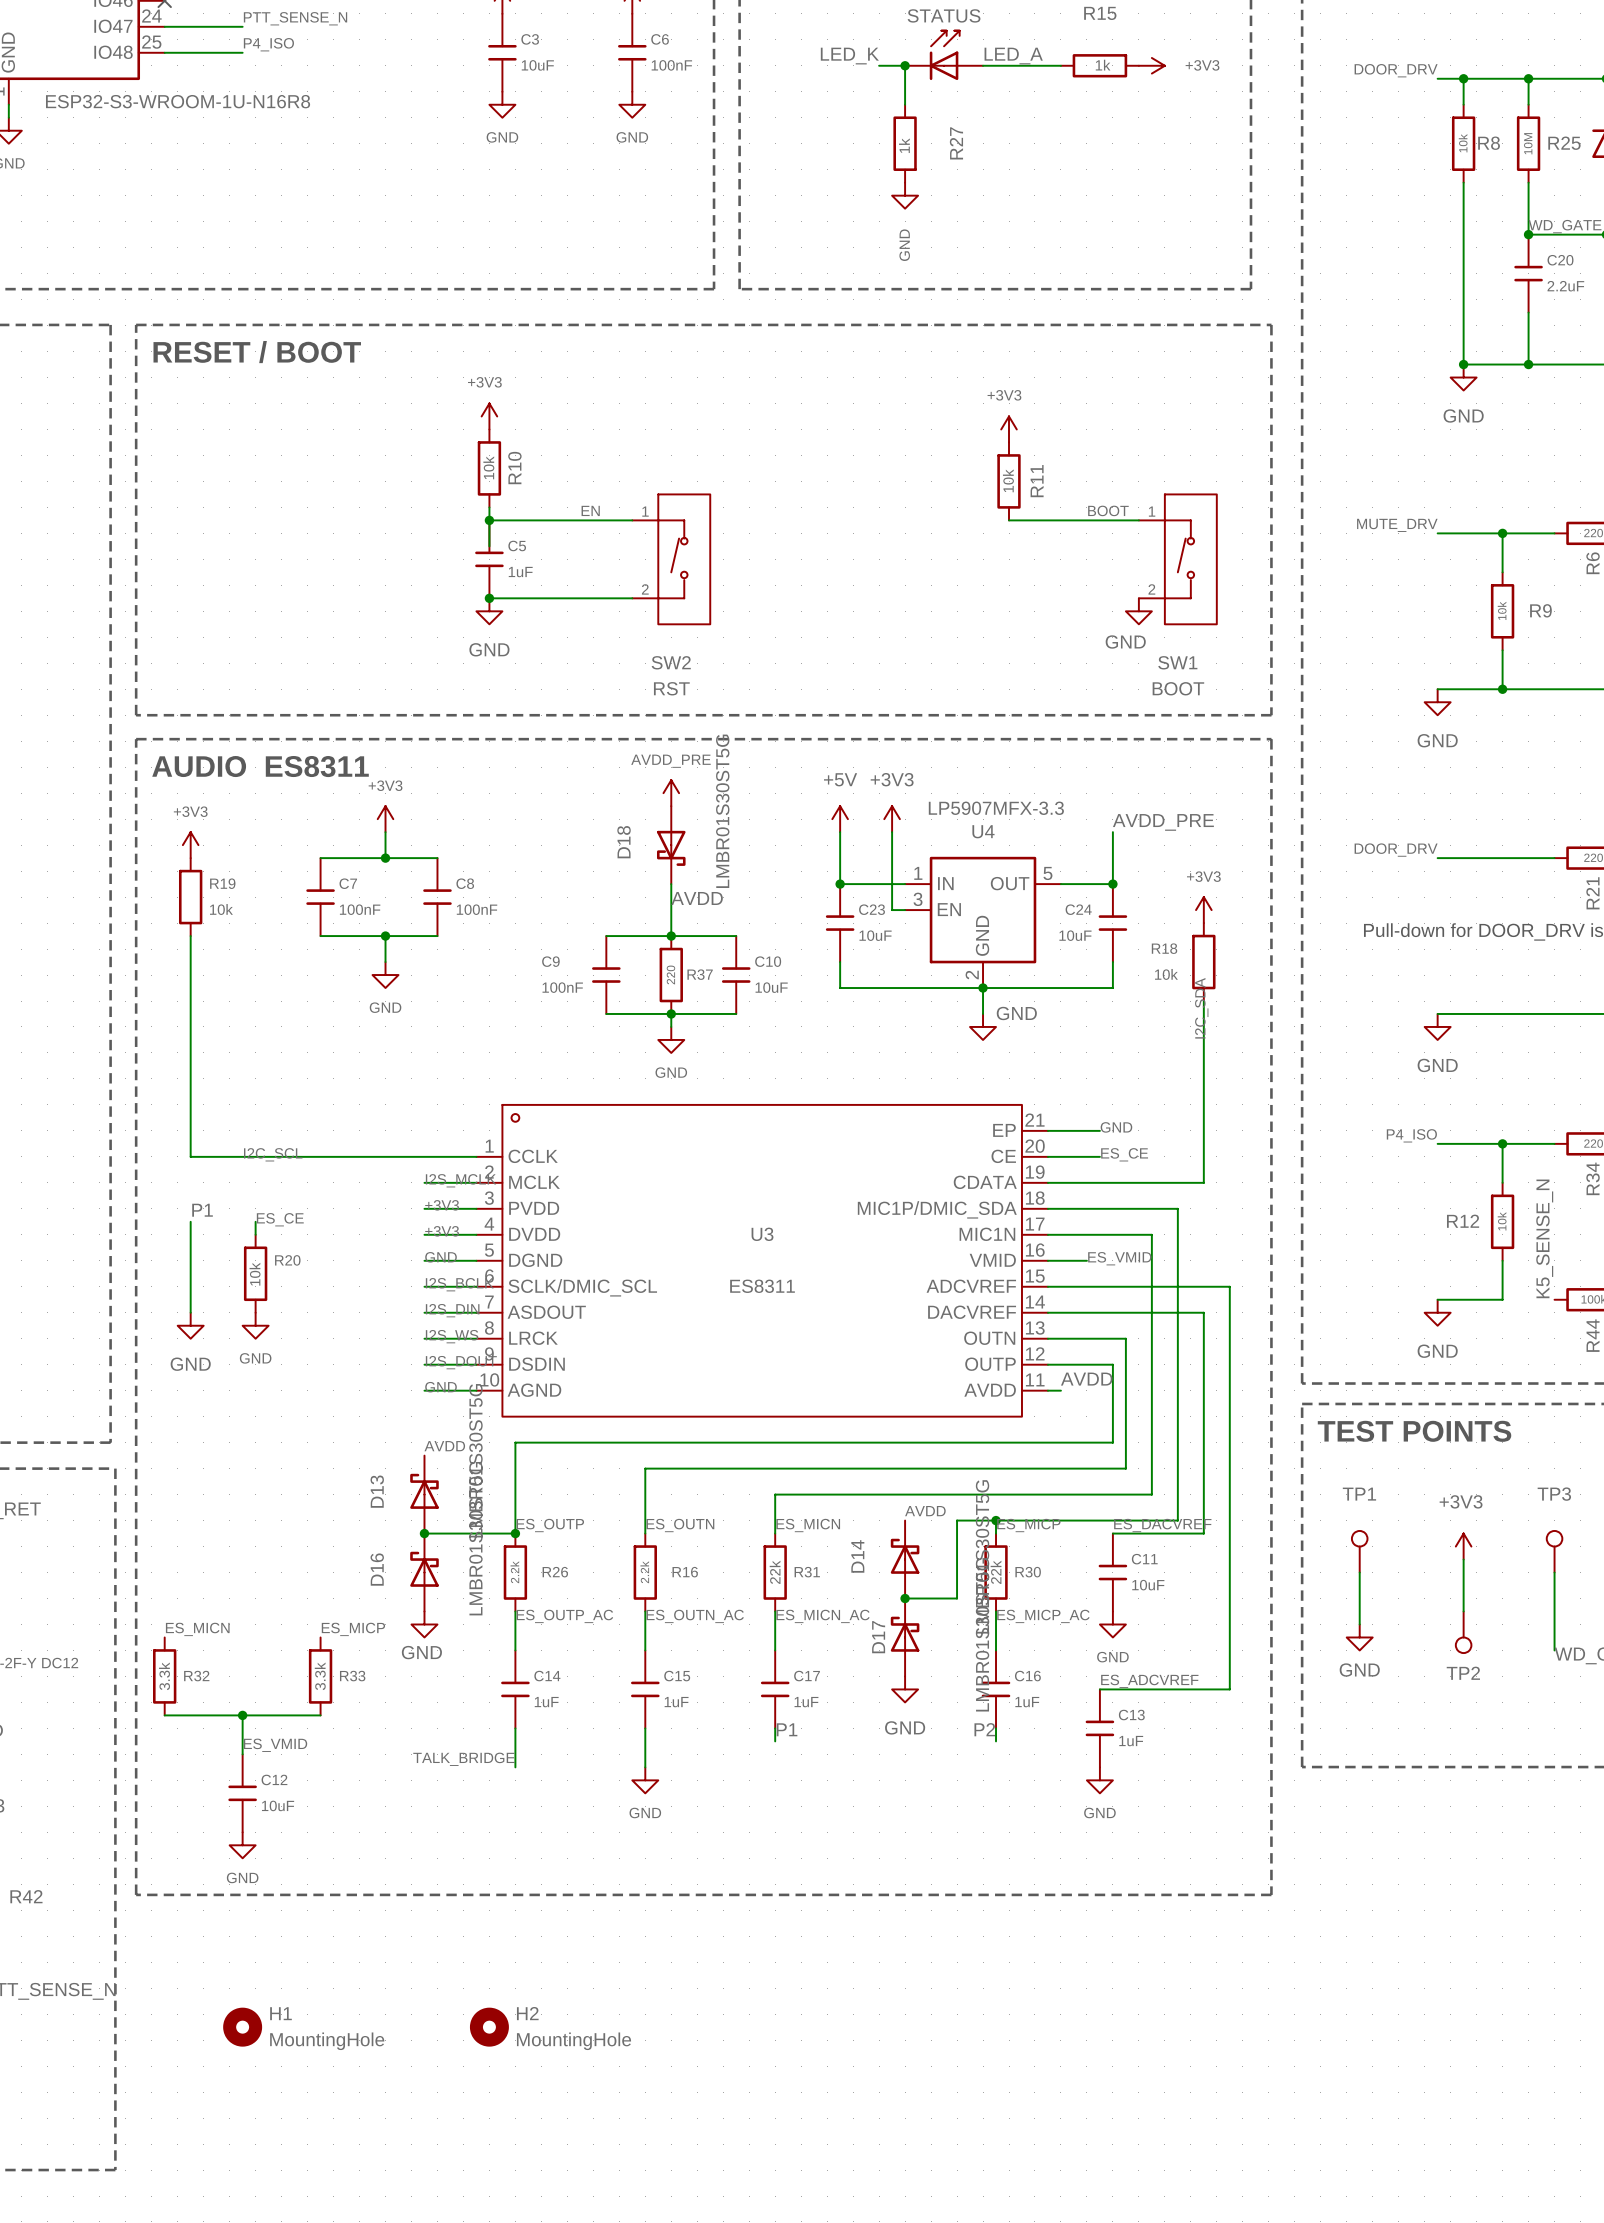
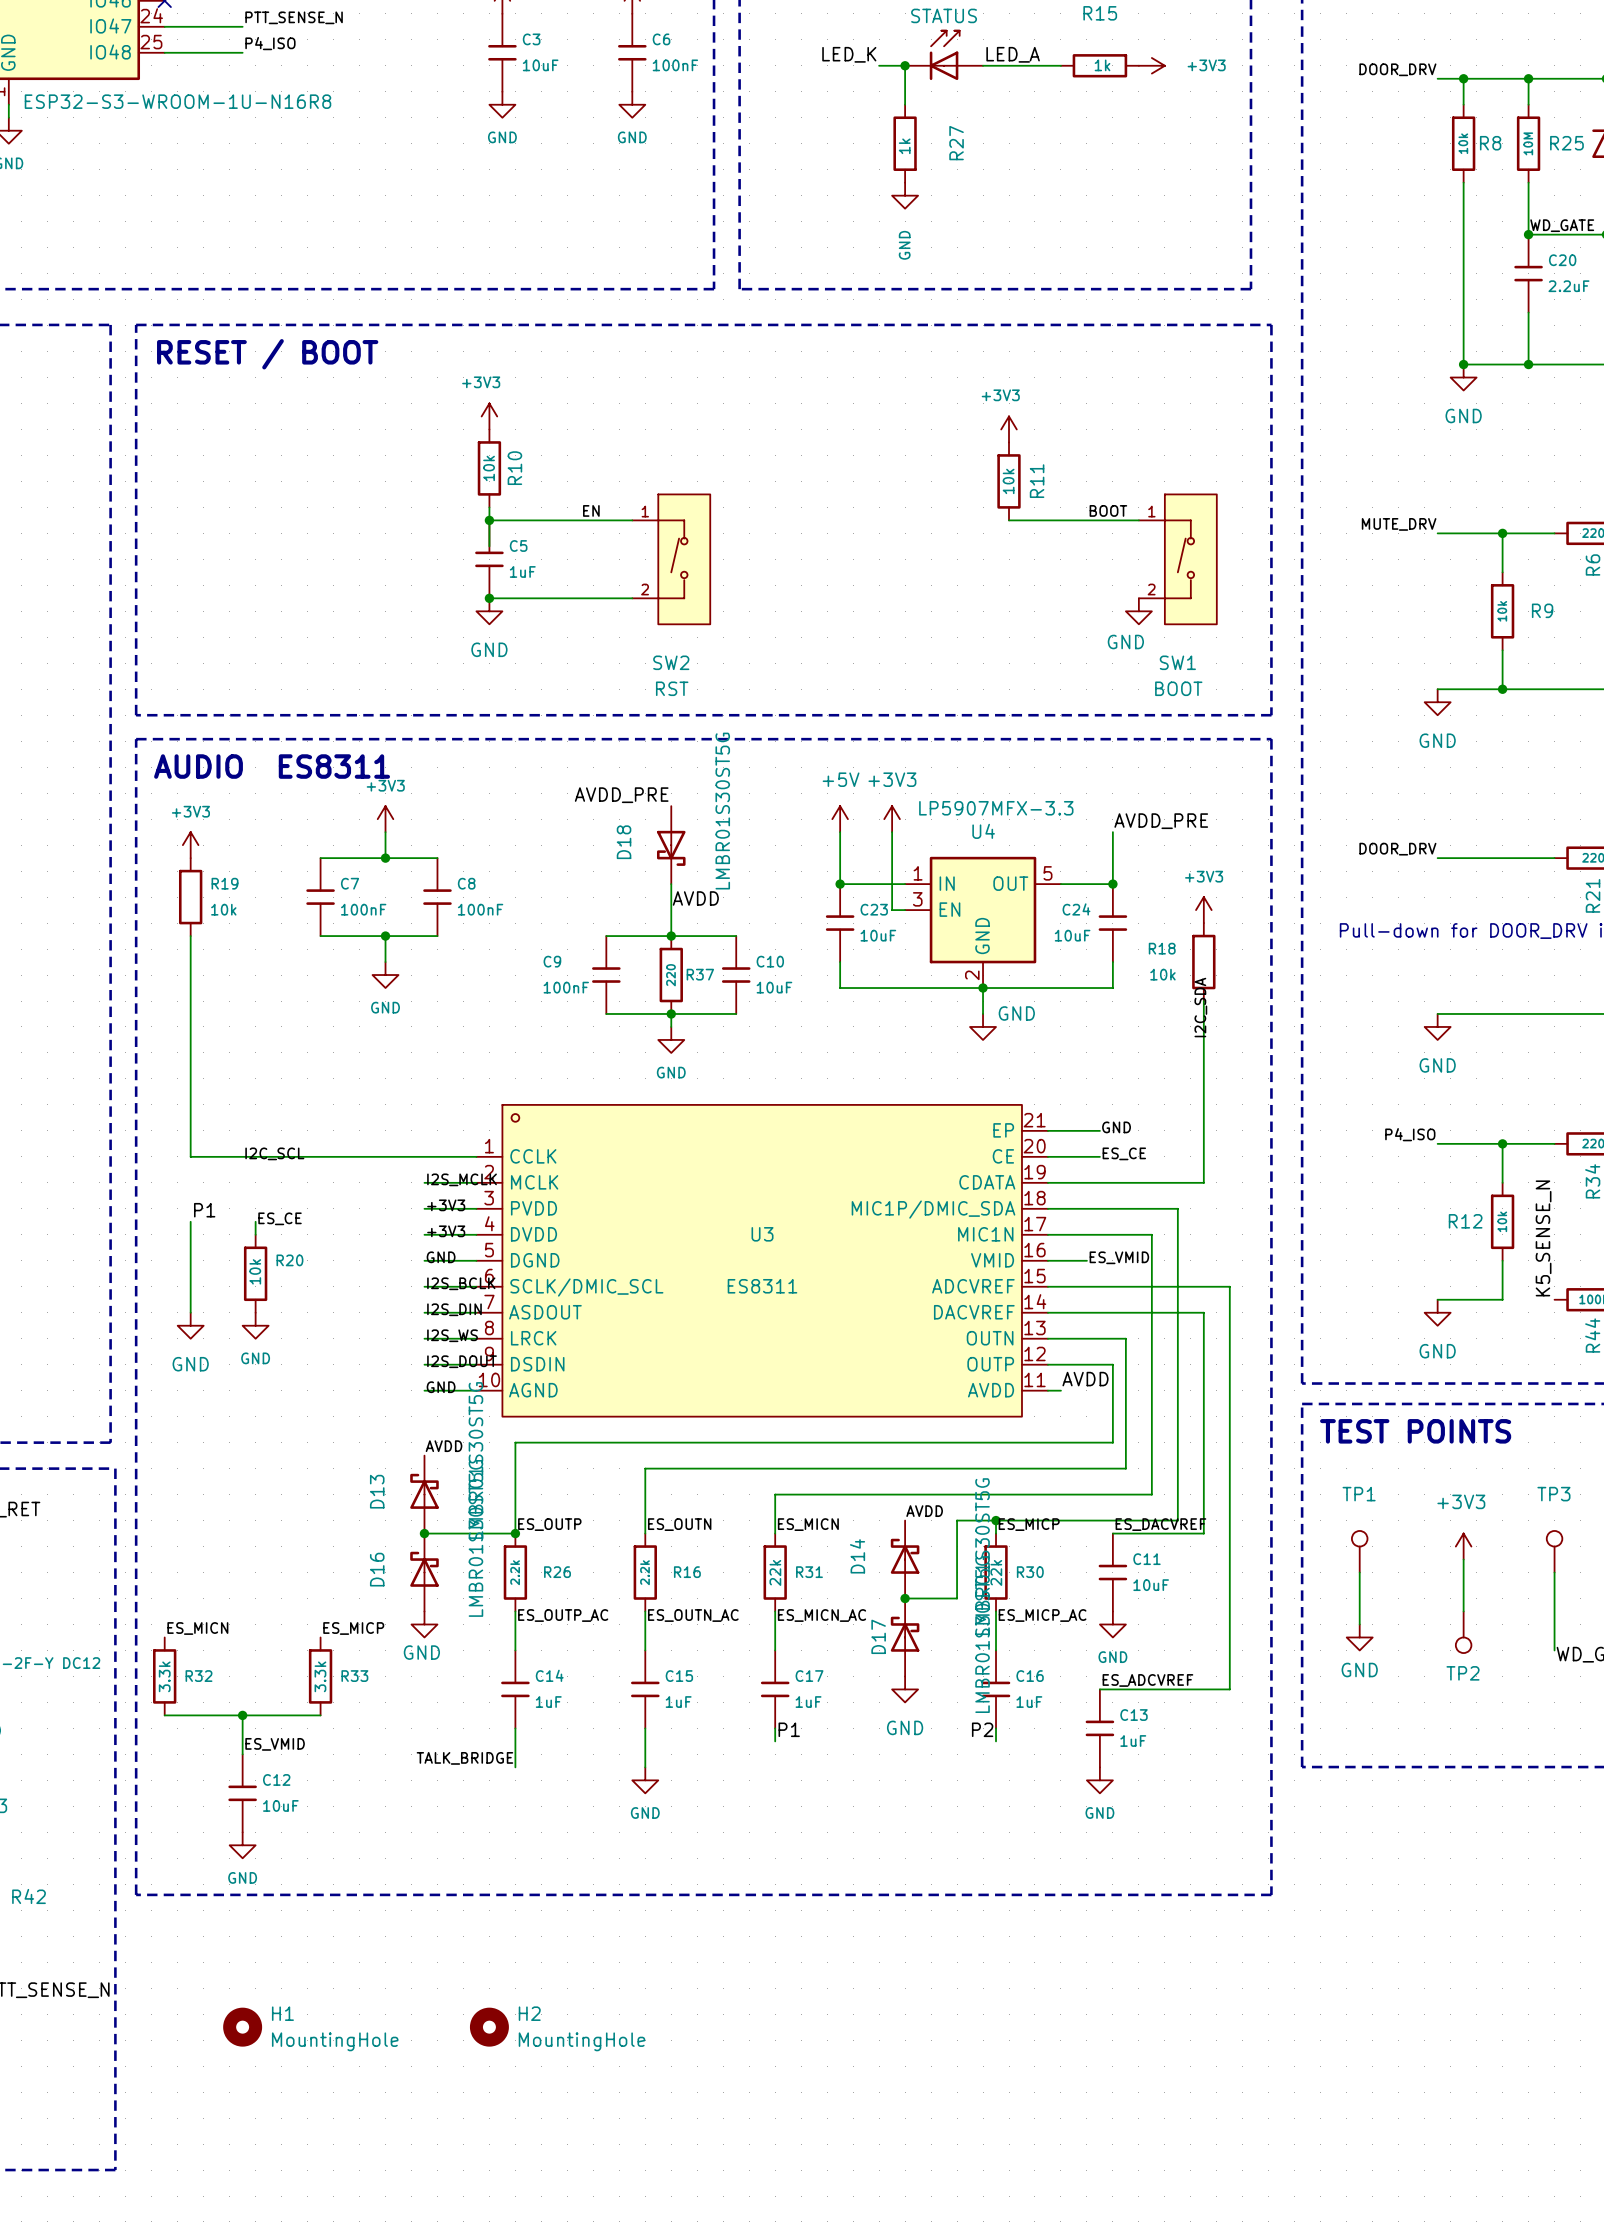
power symbol: AVDD_PRE (671, 793) -> none
label: none -> AVDD_PRE (621, 795)

